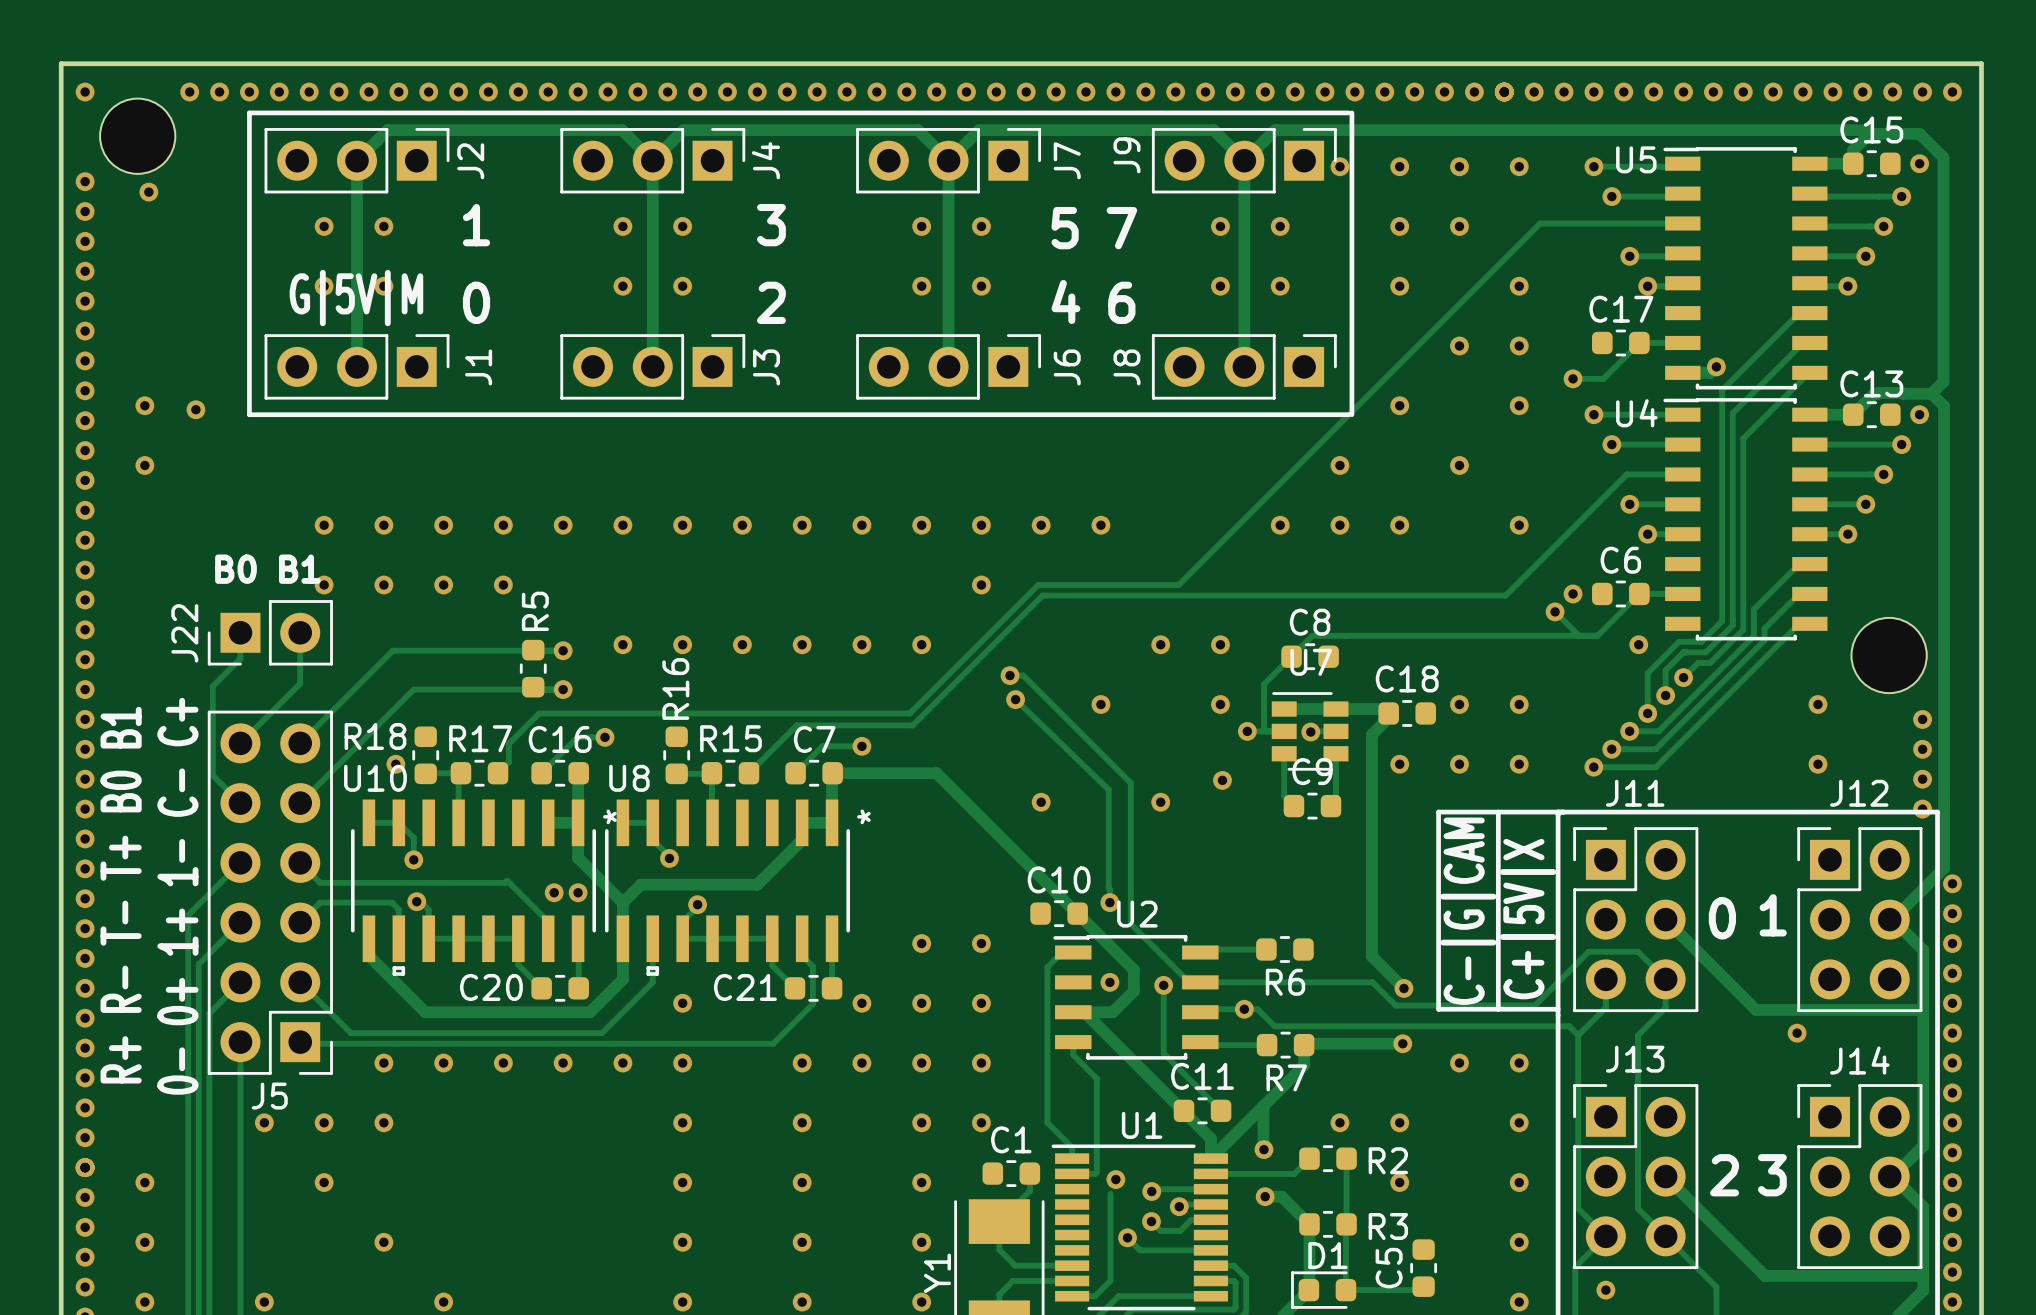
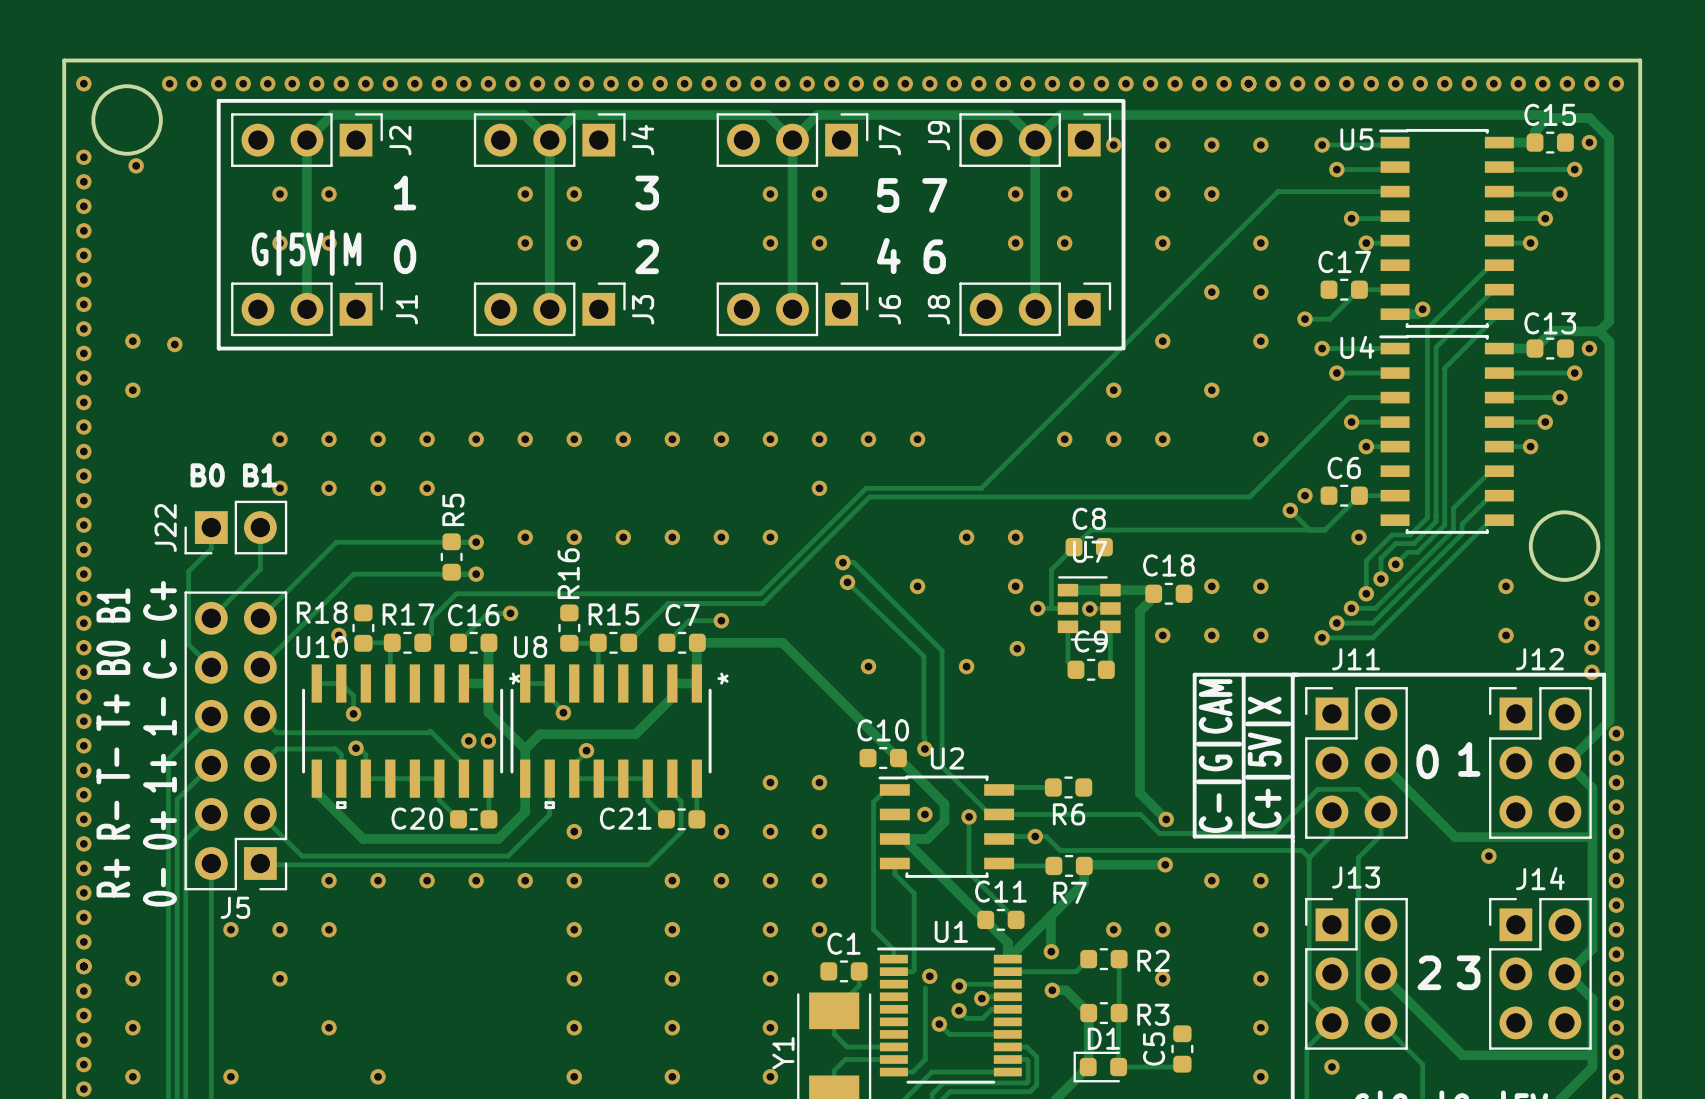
round board edge: none -> [91, 84, 163, 156]
part: (137, 136) -> none
round board edge: none -> [1528, 510, 1601, 582]
part: (1889, 655) -> none

